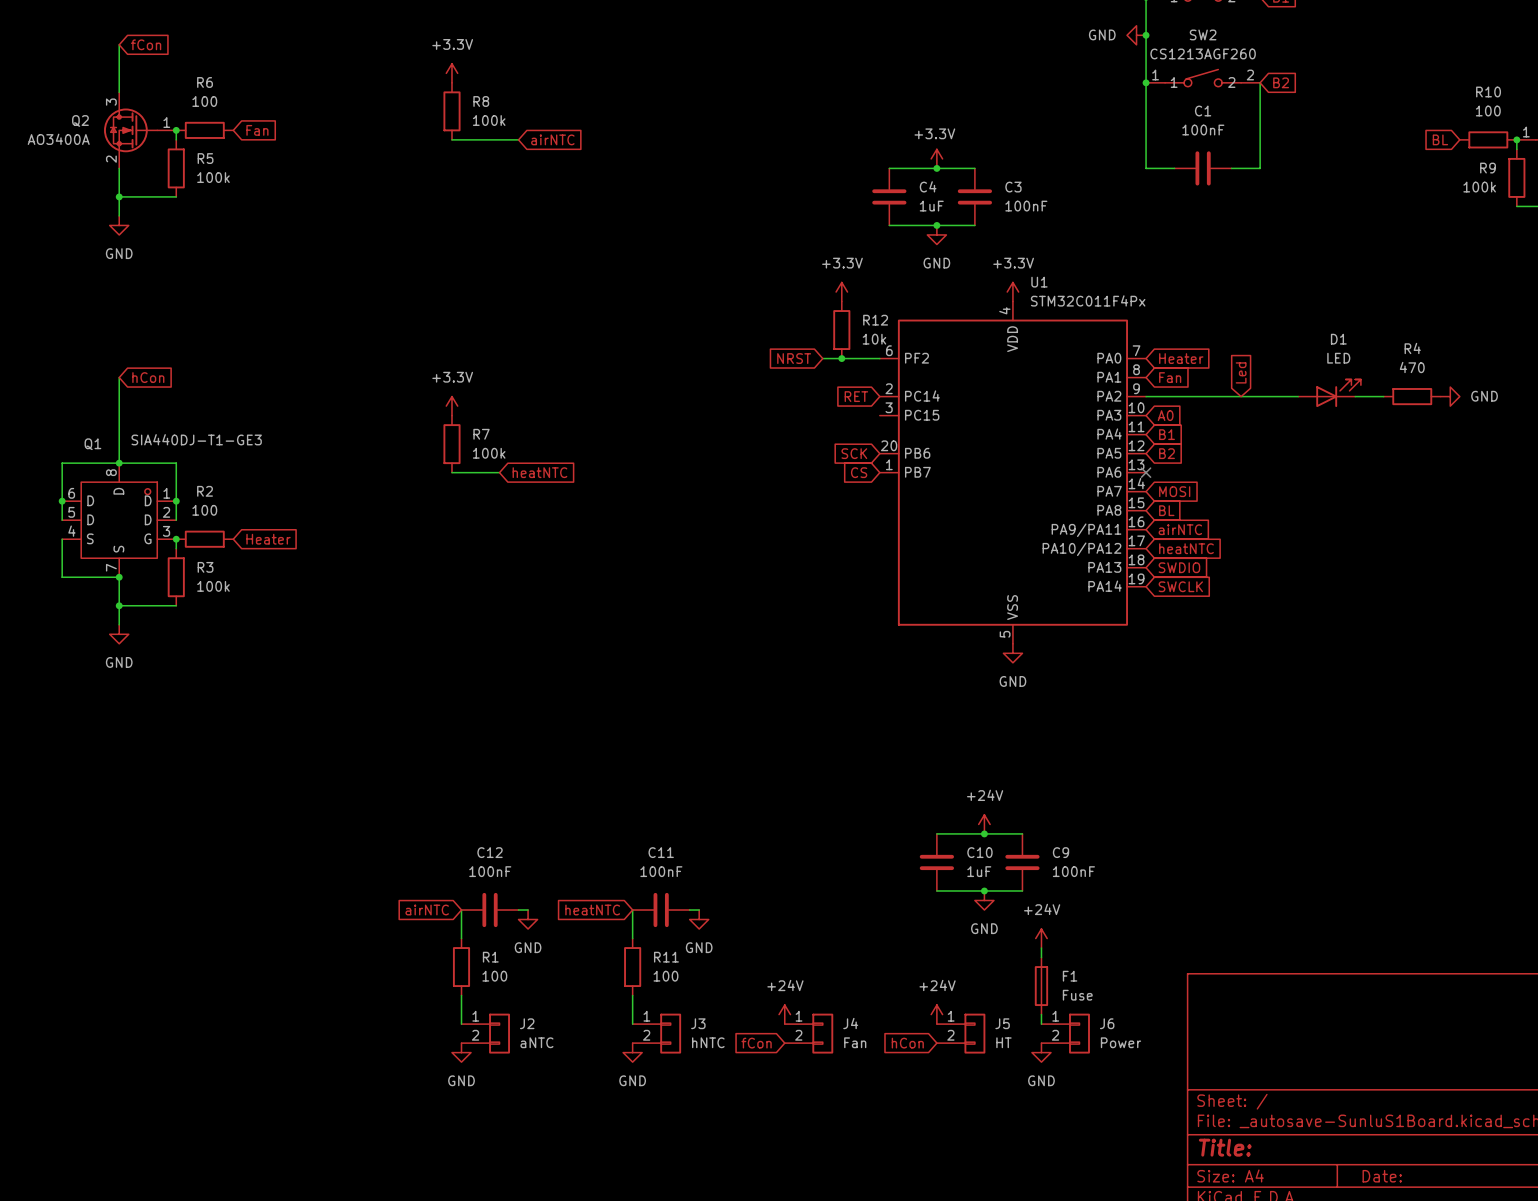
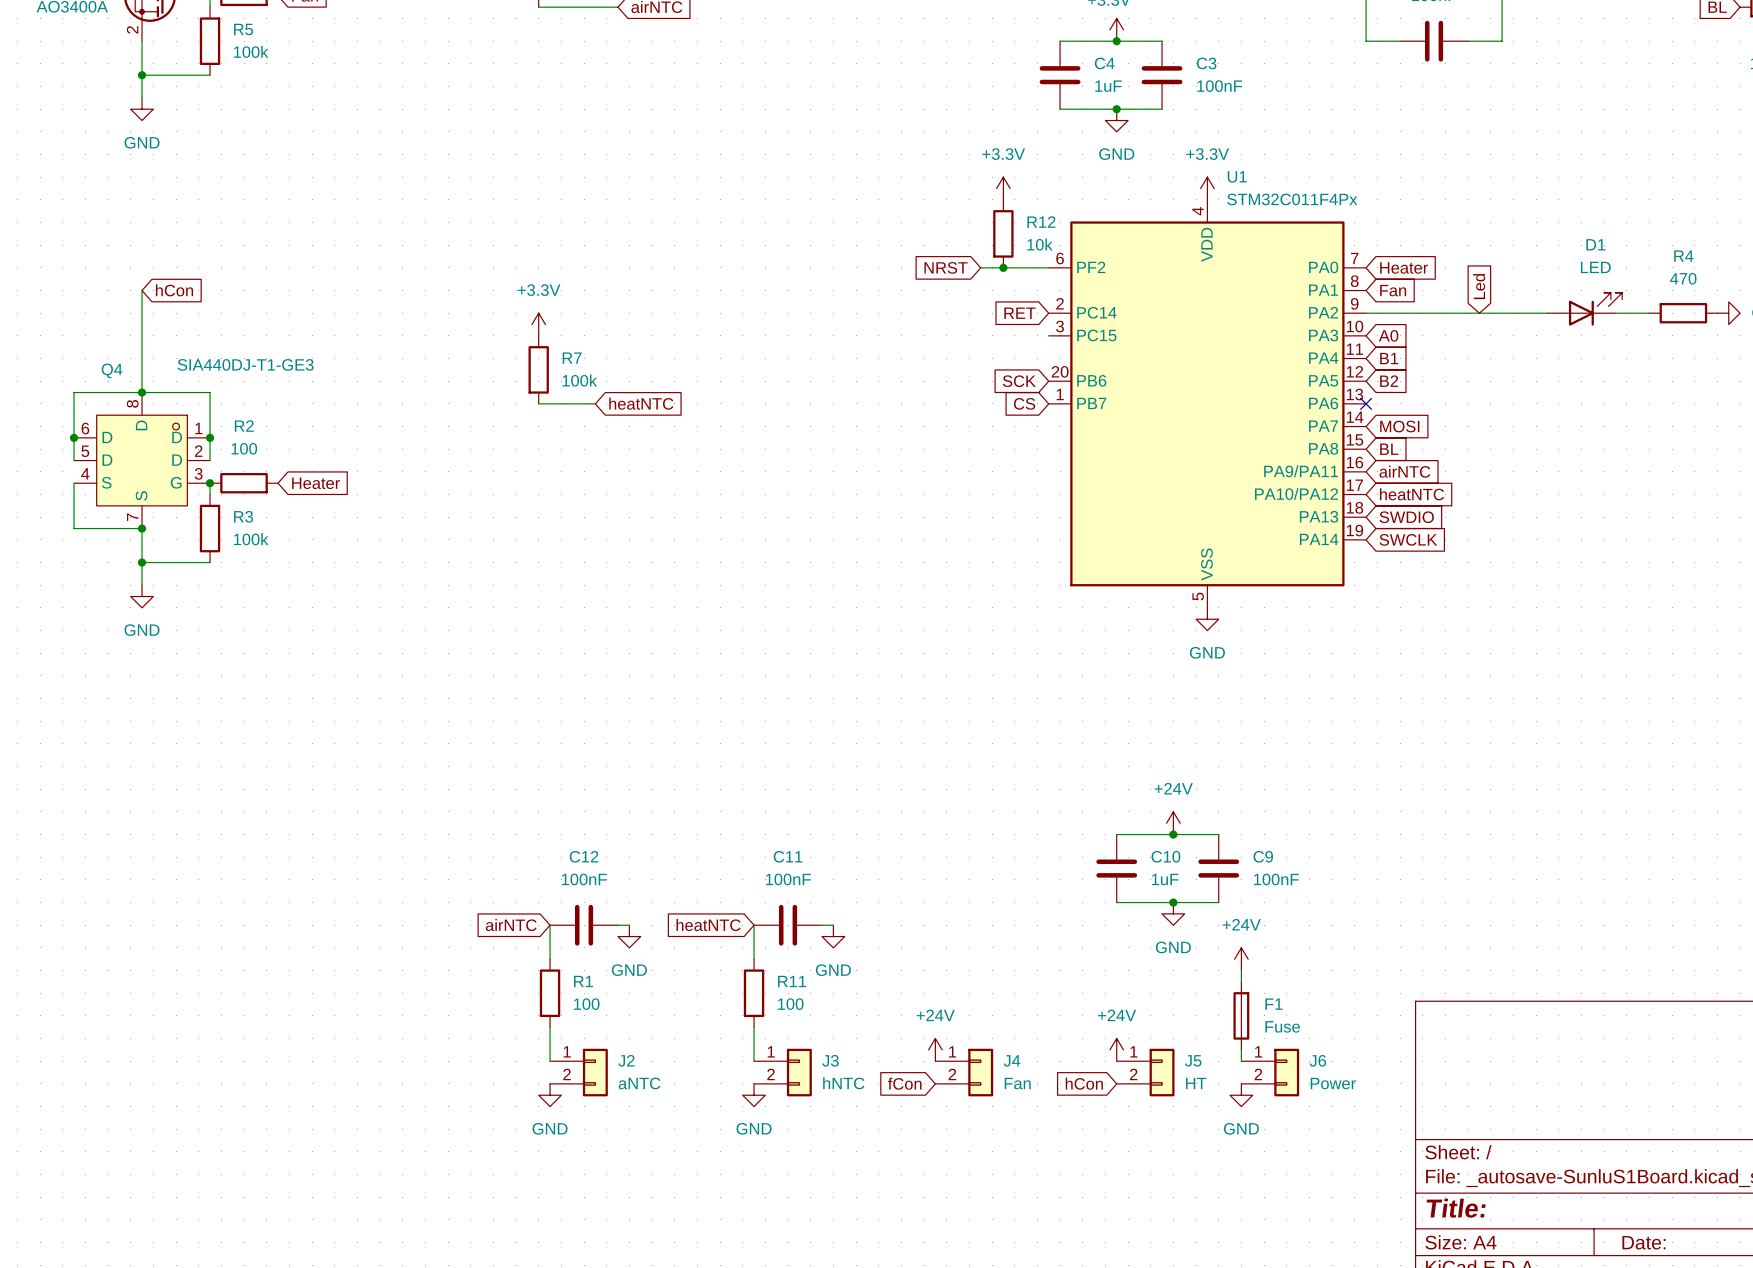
Q1 name: Q1 (92, 444) -> Q4 (112, 370)

